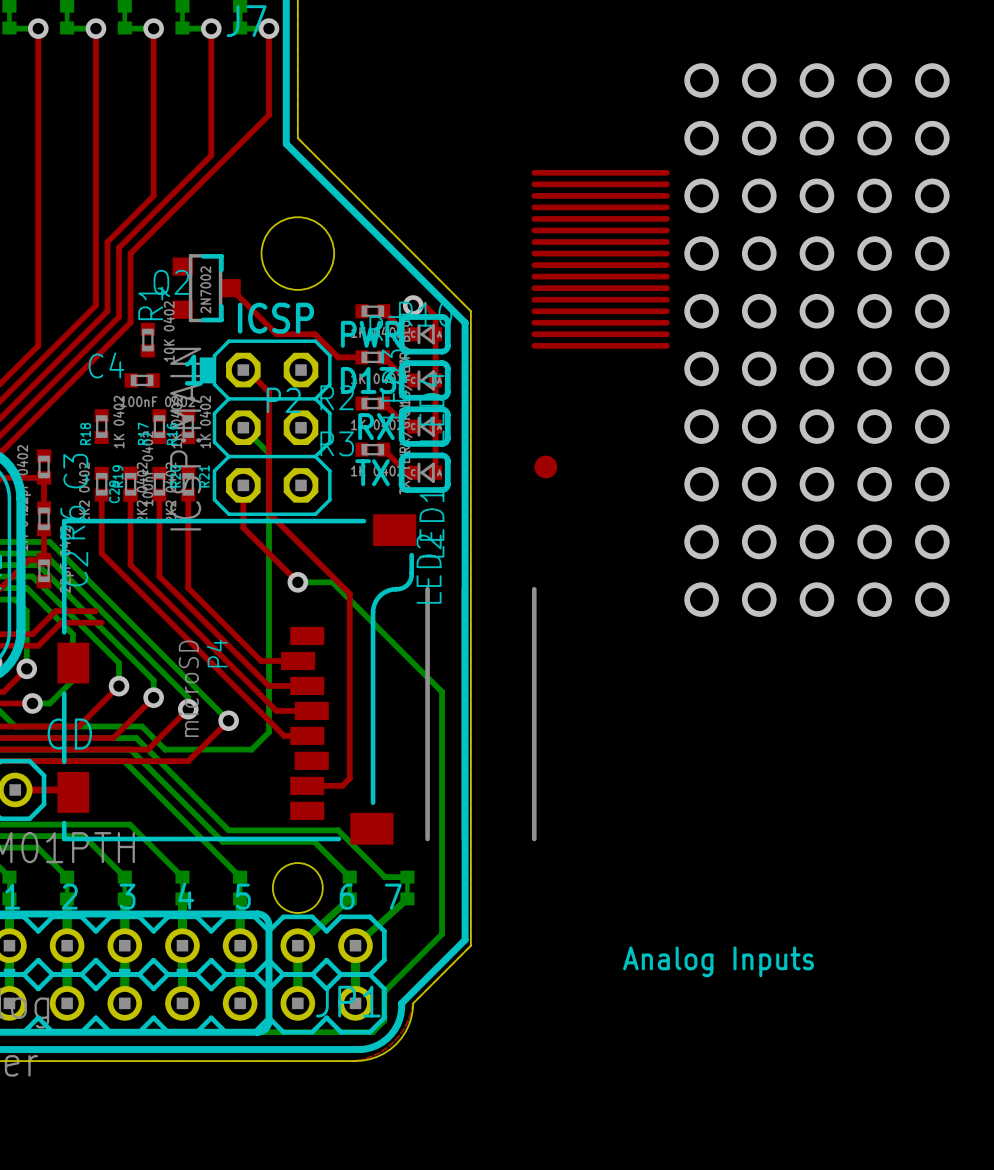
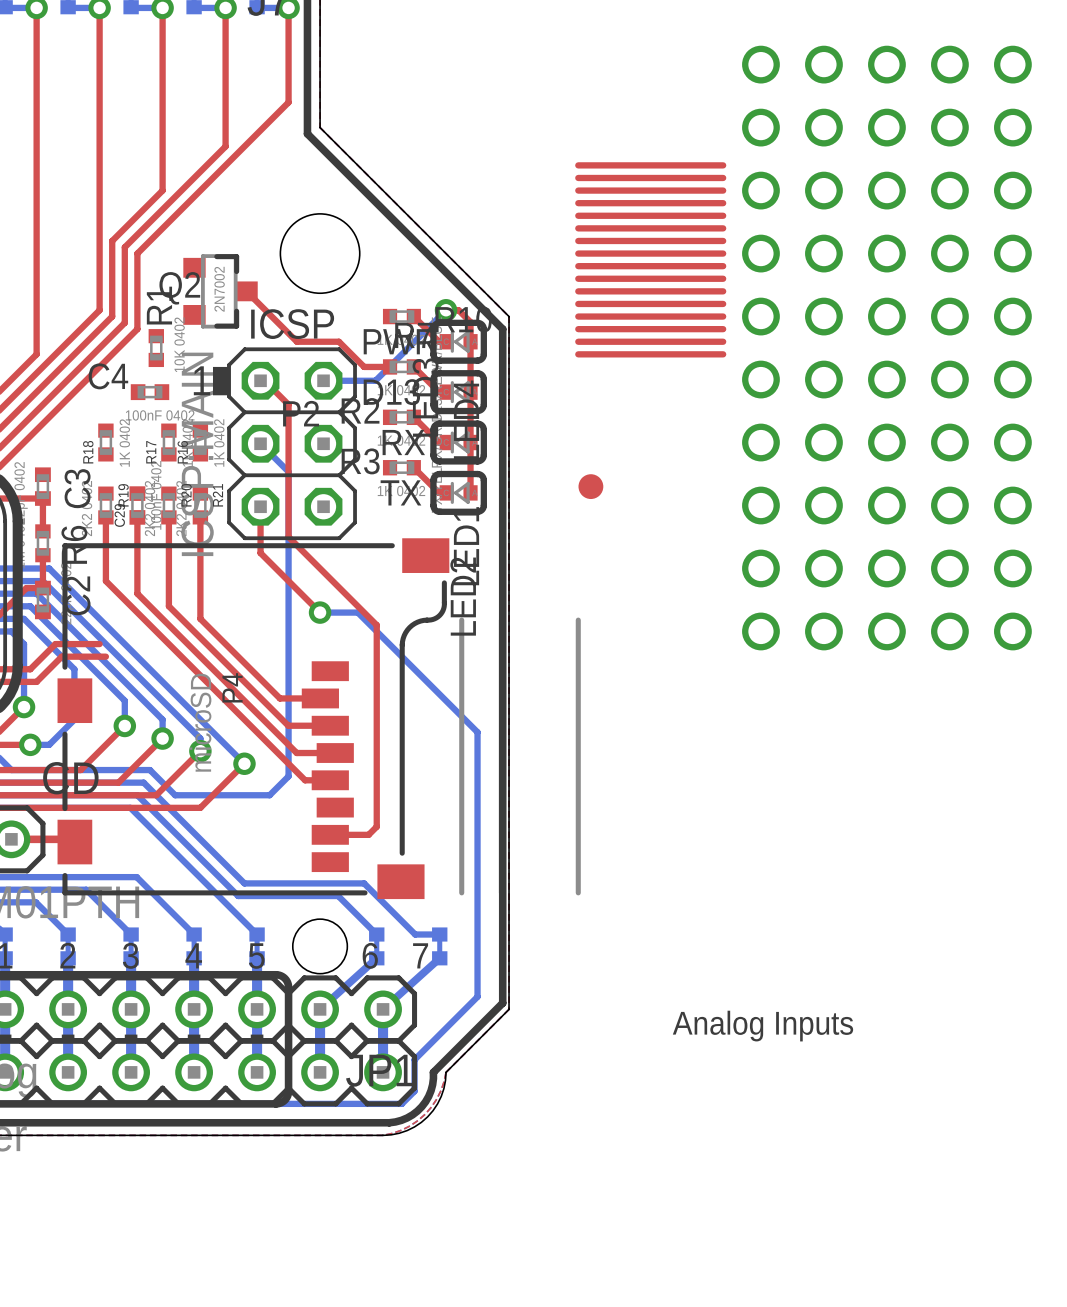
bottom track: none -> (446, 310) (375, 380) (323, 380)

